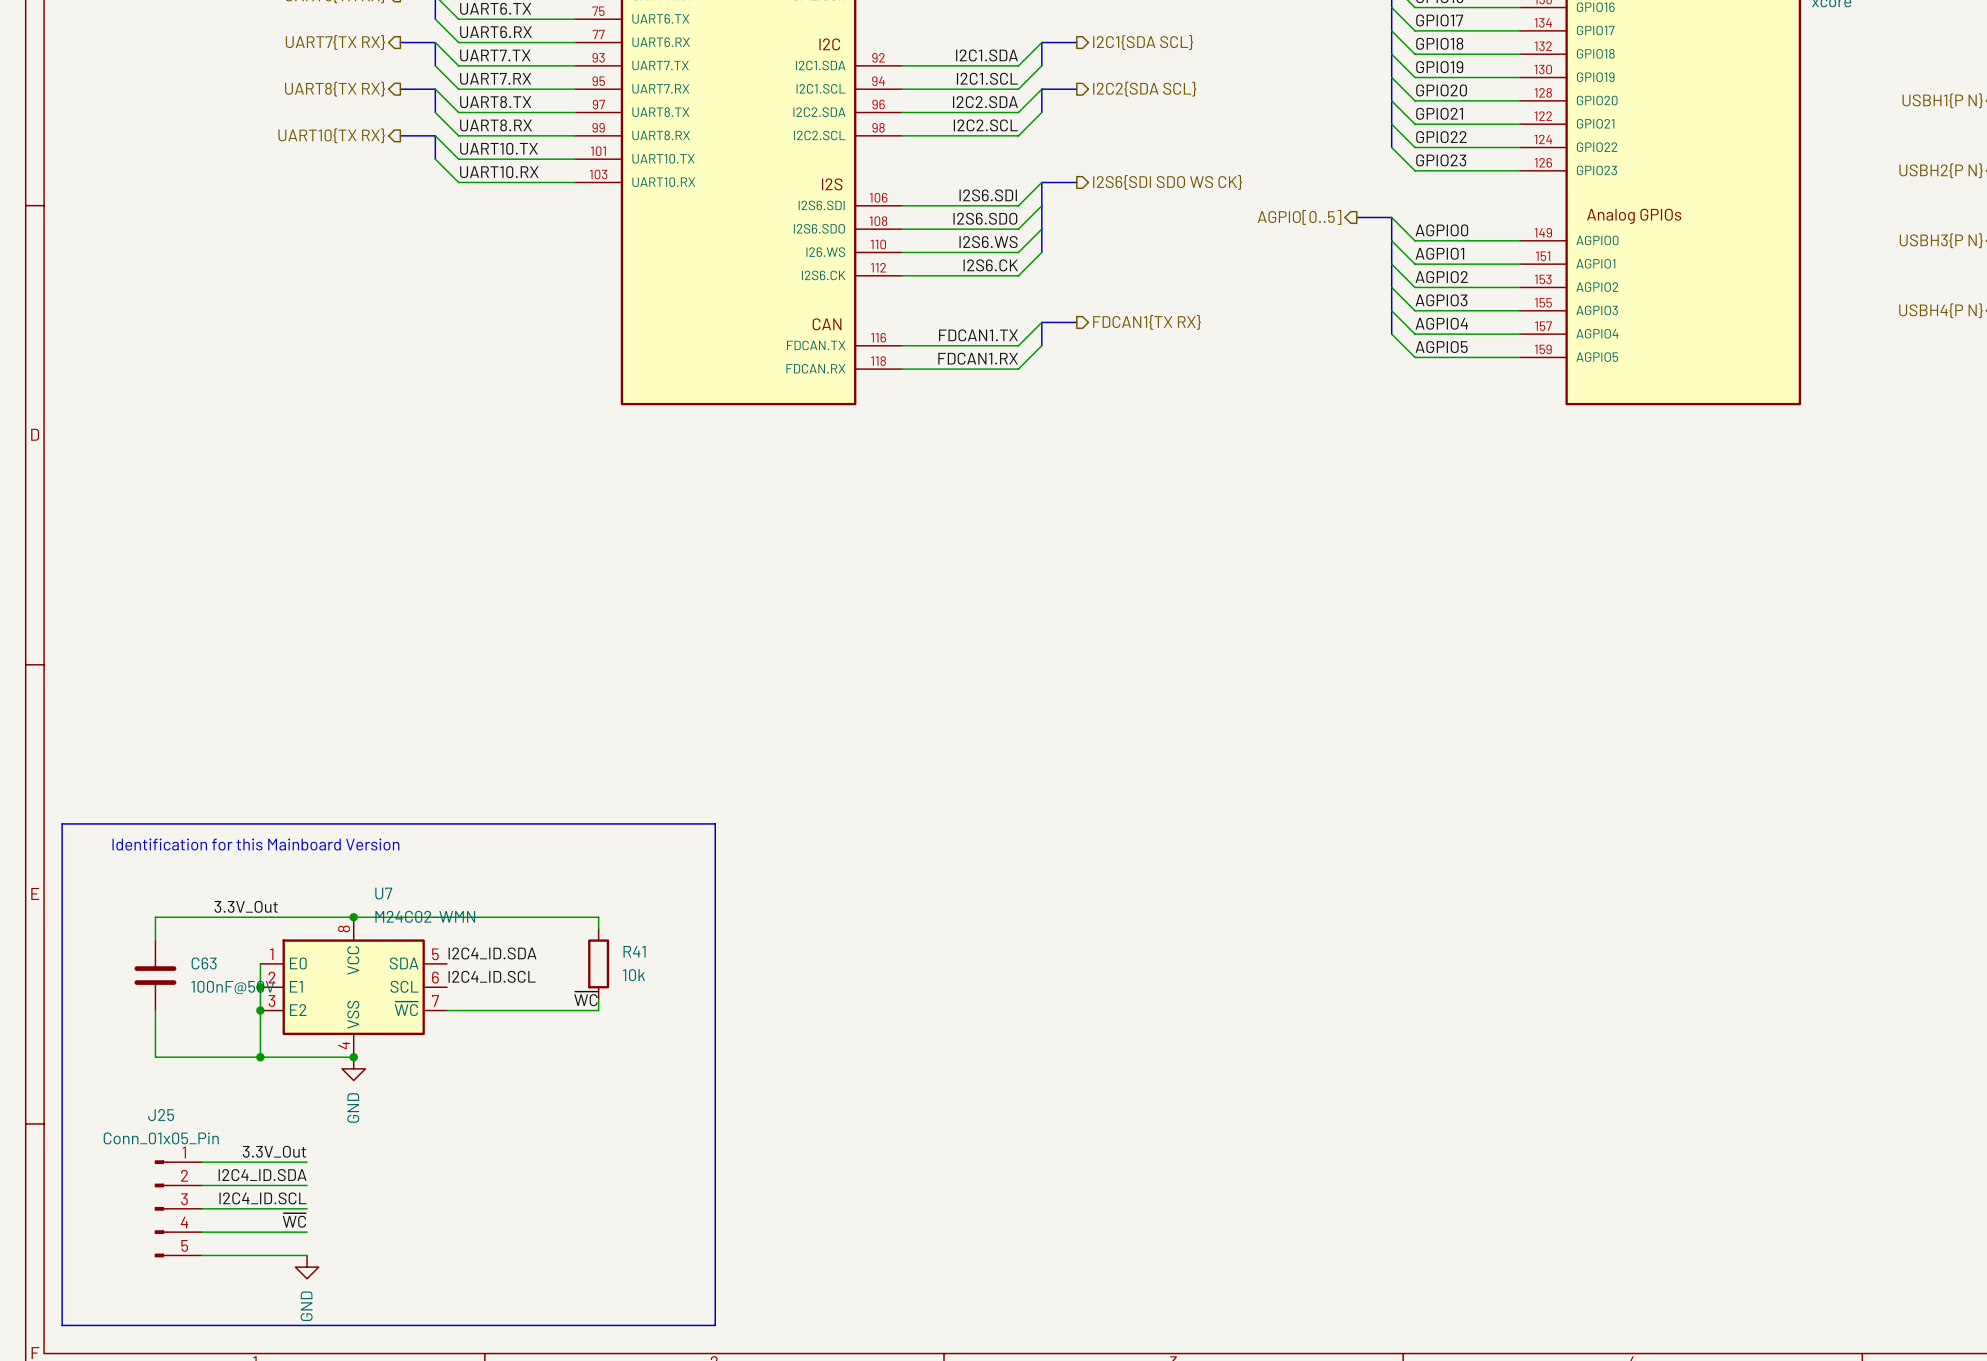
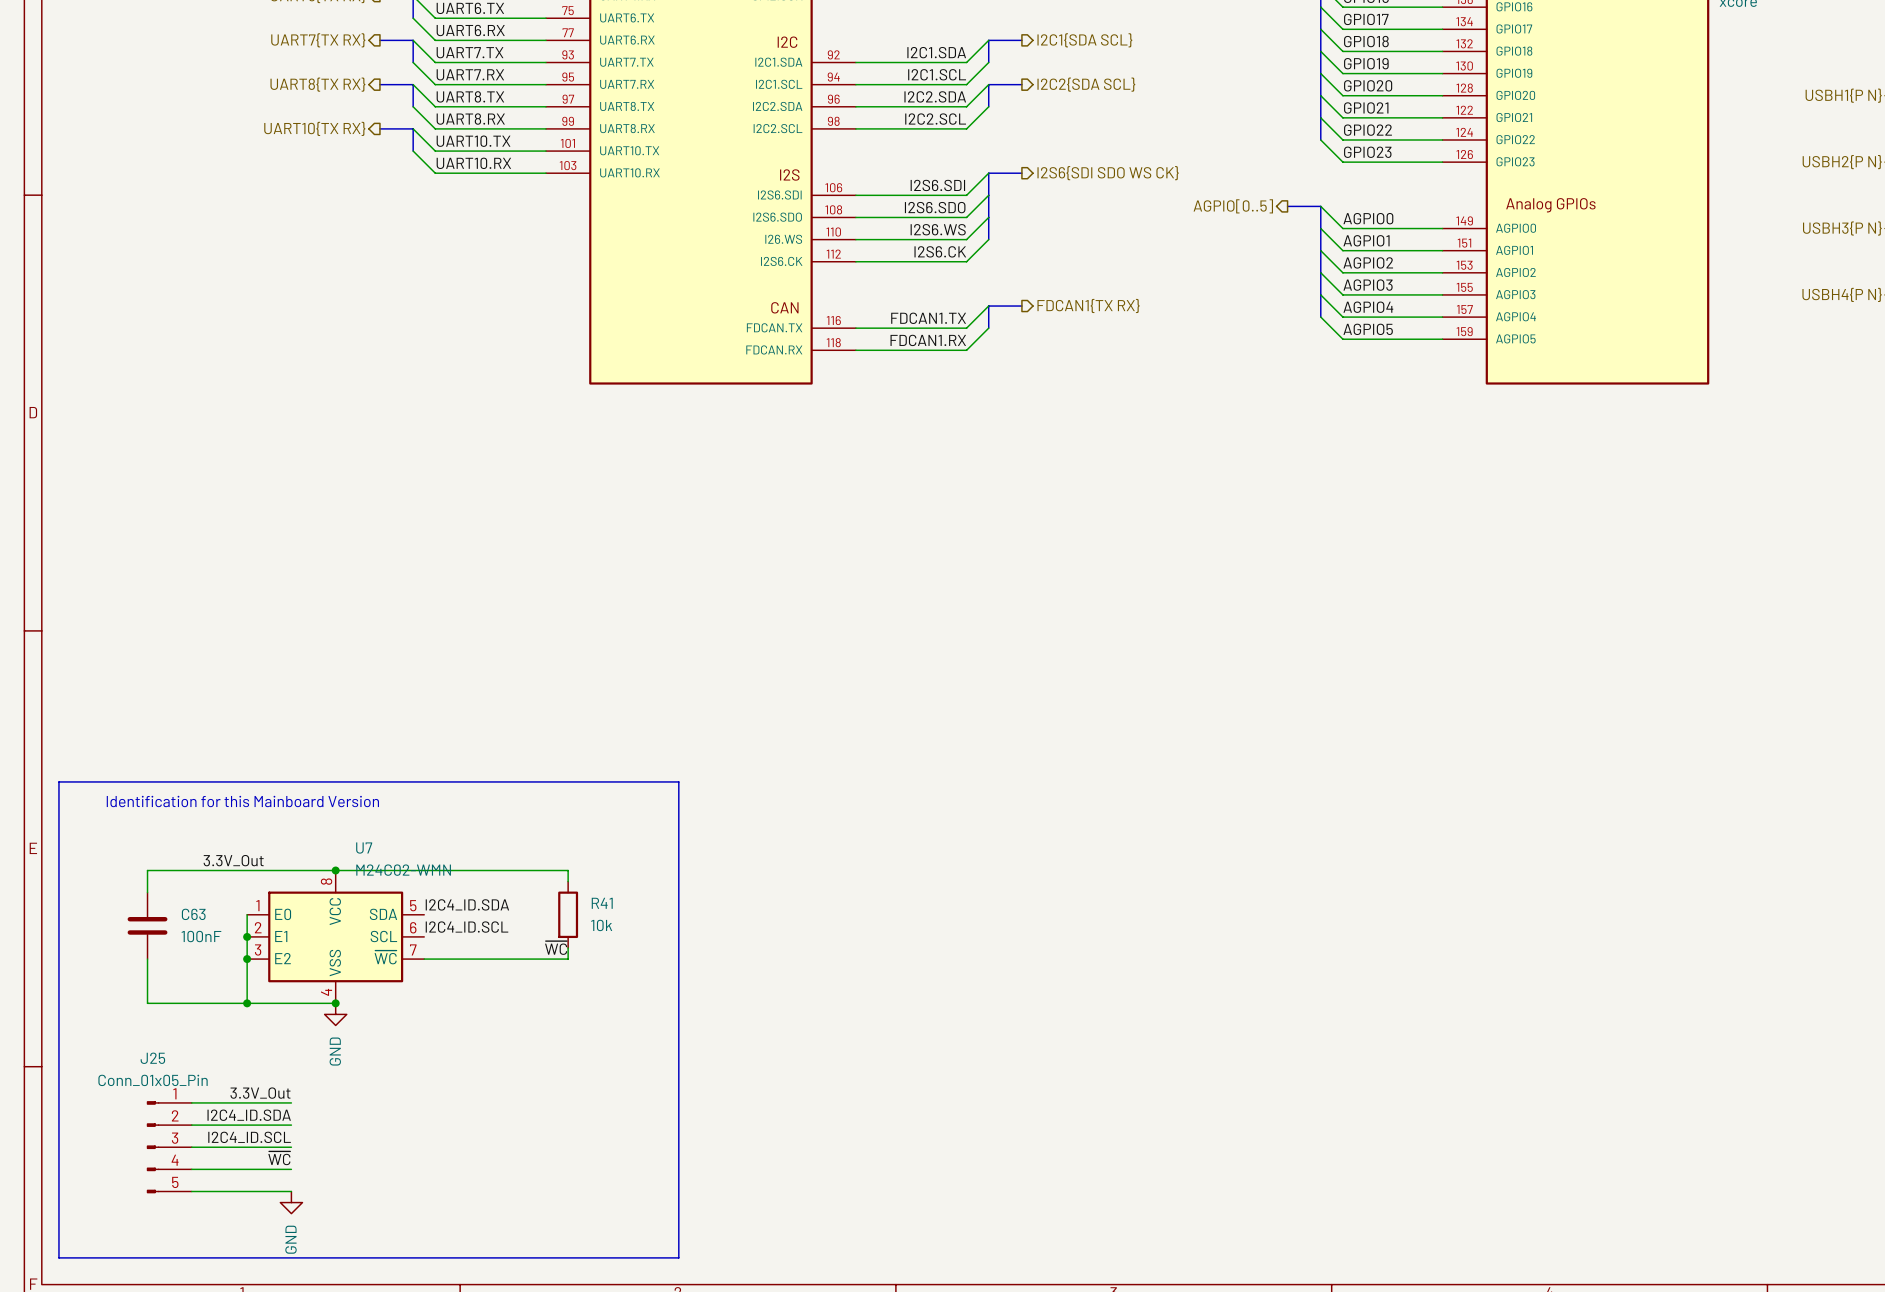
C63 value: 100nF@50V (232, 987) -> 100nF (201, 936)

